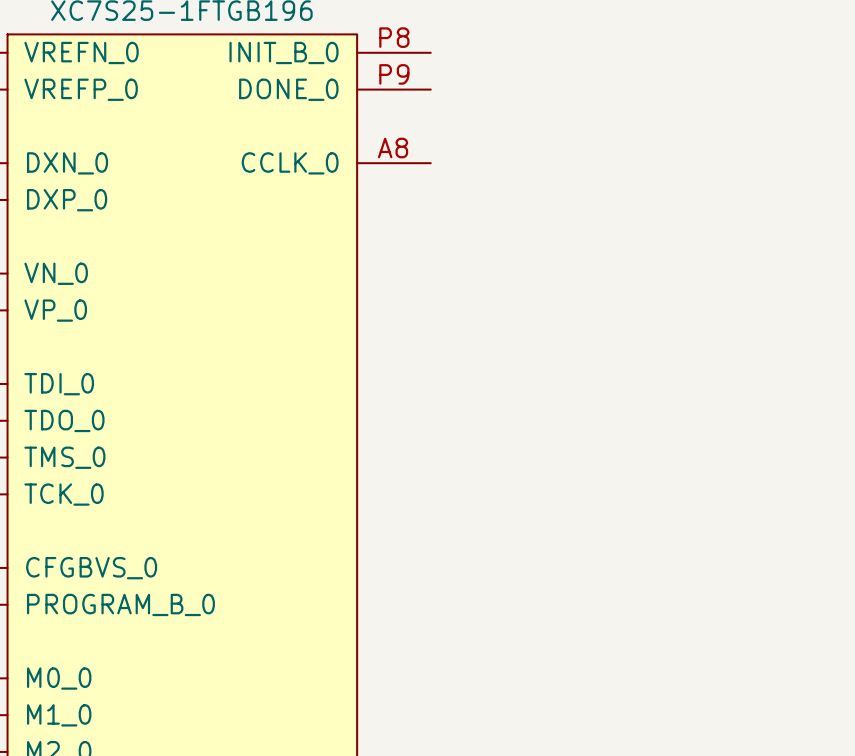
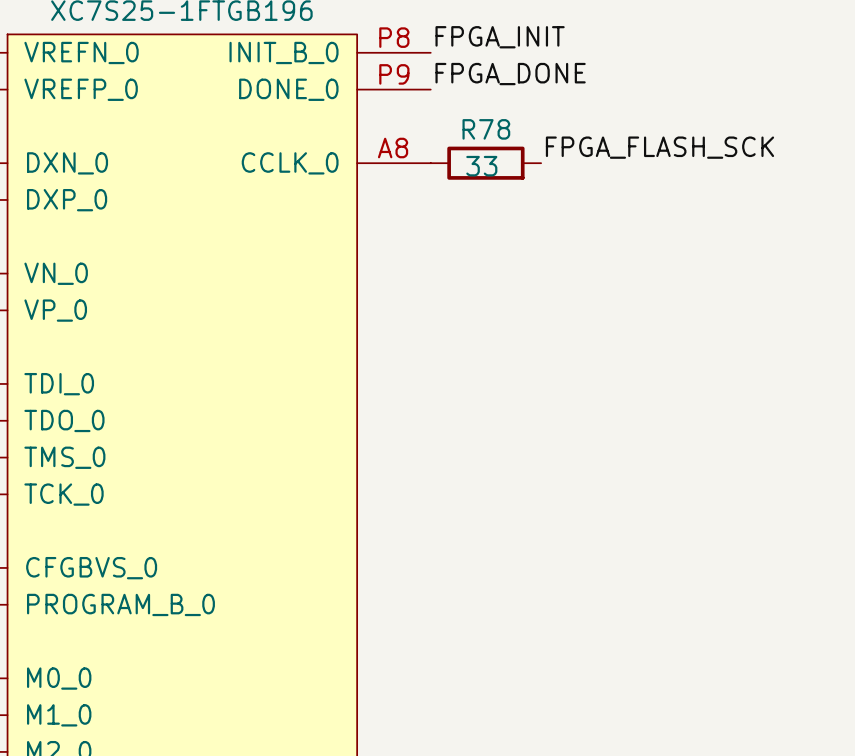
label: none -> FPGA_INIT (500, 37)
label: none -> FPGA_DONE (510, 74)
label: none -> FPGA_FLASH_SCK (659, 147)
R78: none -> 33 (485, 163)

